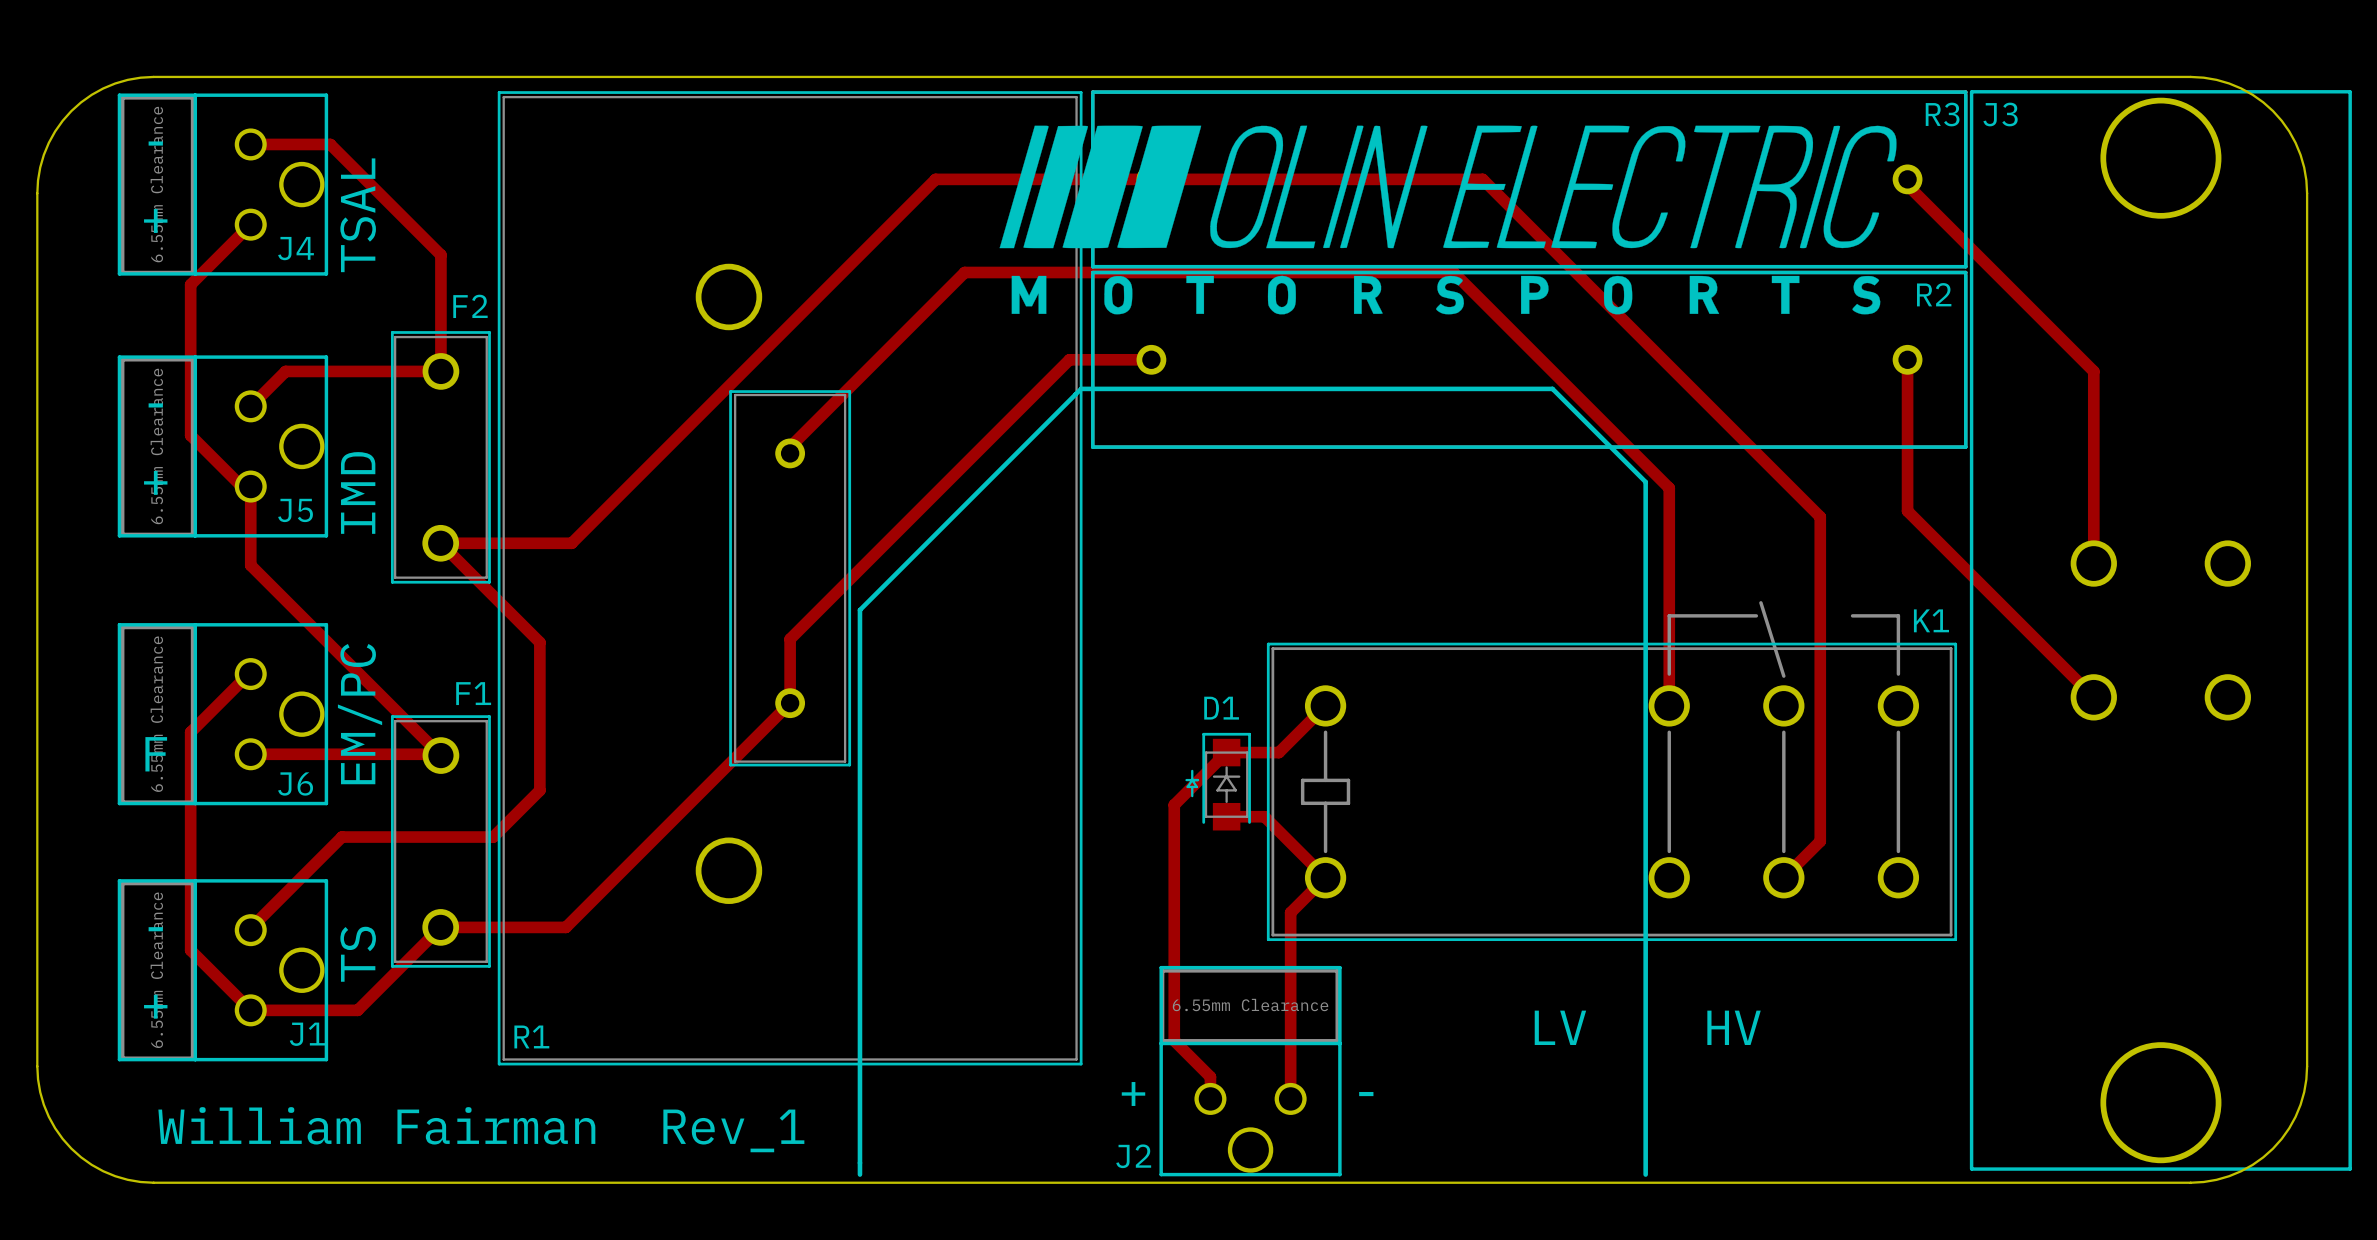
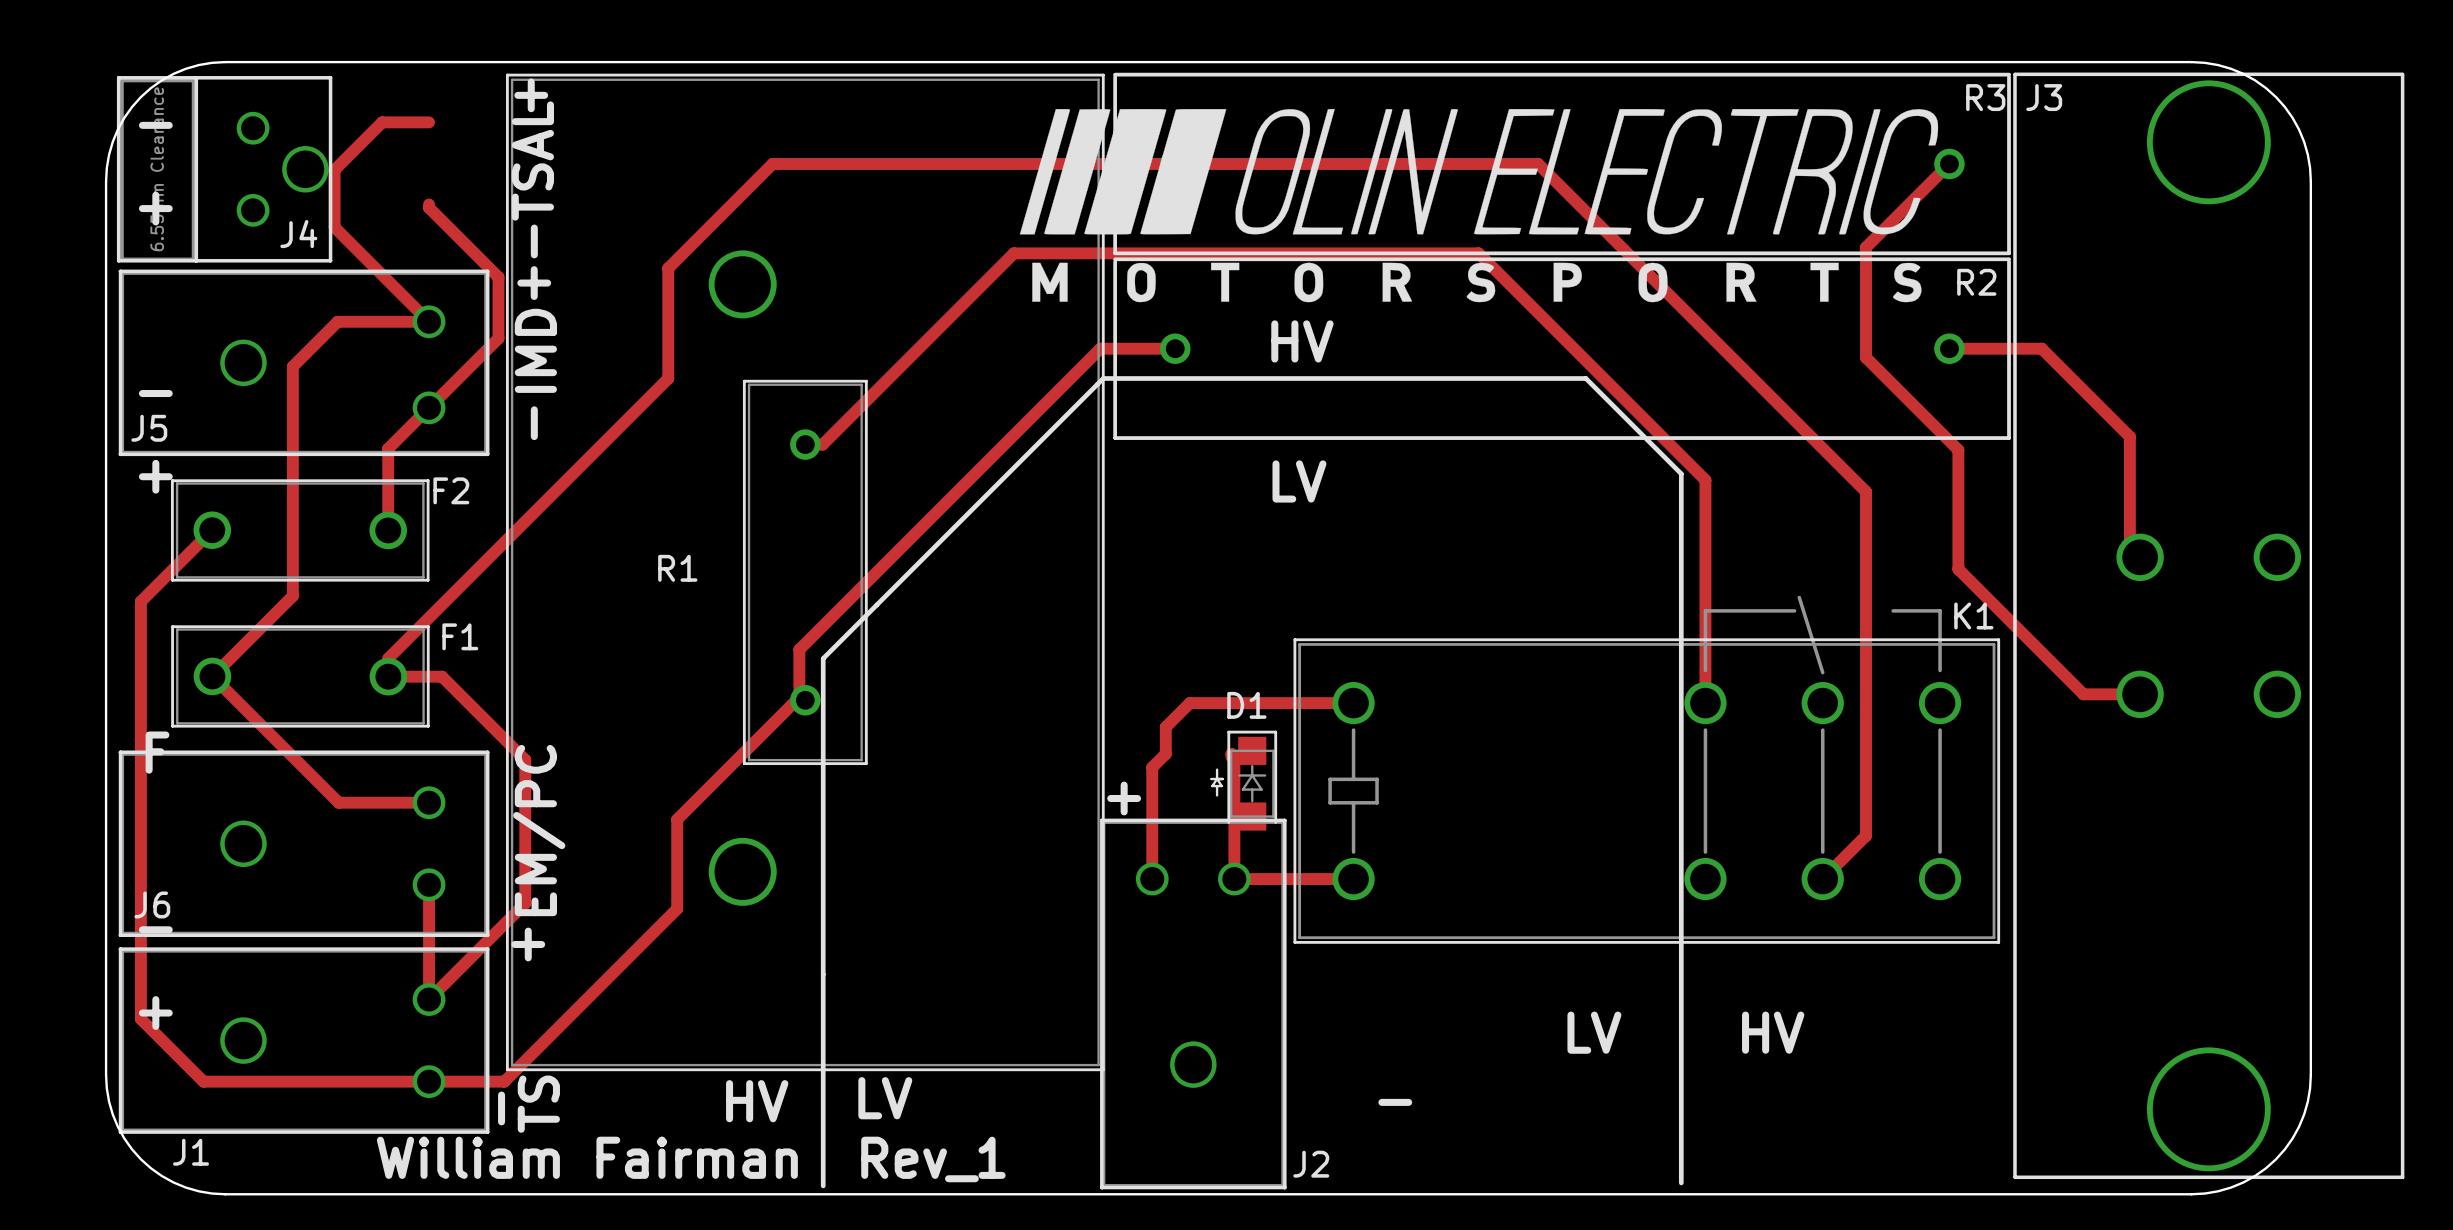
board edge: (153, 76) (2190, 76) (2216, 79) (2241, 88) (2263, 102) (2289, 131) (2304, 167) (2307, 193) (2307, 1066) (2304, 1092) (2295, 1116) (2273, 1148) (2252, 1164) (2229, 1176) (2190, 1182) (153, 1182) (127, 1179) (103, 1171) (81, 1157) (55, 1128) (43, 1104) (38, 1079) (37, 193) (40, 167) (48, 142) (71, 111) (103, 88) (127, 79) (153, 76) -> (225, 62) (198, 65) (173, 73) (140, 97) (117, 129) (109, 154) (106, 181) (106, 1088) (112, 1114) (132, 1149) (150, 1168) (173, 1182) (198, 1191) (225, 1194) (2191, 1194) (2231, 1187) (2255, 1176) (2275, 1159) (2299, 1126) (2307, 1101) (2310, 1075) (2310, 181) (2307, 154) (2292, 117) (2275, 97) (2243, 73) (2218, 65) (2191, 62) (225, 62)
text: none -> + (531, 95)
top track: none -> (429, 122) (382, 122) (334, 169) (334, 227) (429, 321)
top track: (250, 144) (330, 144) (440, 255) (440, 371) (285, 371) (250, 406) -> none
top track: (935, 179) (571, 543) (432, 543) -> (954, 163) (772, 163) (668, 268) (668, 378) (388, 658) (388, 676) (442, 676) (525, 759) (525, 903) (429, 999) (429, 884)
top track: (1482, 179) (1820, 516) (1820, 841) -> (1514, 163) (1538, 163) (1866, 491) (1866, 835) (1860, 841)
top track: none -> (1949, 163) (1866, 247) (1866, 357) (1958, 450) (1958, 569) (2083, 694) (2119, 694)
top track: (1907, 185) (2093, 371) (2093, 563) -> none
text position: TSAL (358, 215) -> TSAL (532, 161)
top track: none -> (429, 204) (429, 207) (498, 277) (498, 338) (388, 448) (388, 530)
top track: (250, 224) (190, 284) (190, 435) (241, 486) (250, 486) (250, 565) (440, 755) -> none
text: none -> - (534, 241)
top track: (1453, 272) (964, 272) (790, 447) (790, 453) -> (1484, 259) (1478, 253) (1013, 253) (822, 444) (810, 444)
text: none -> + (534, 283)
F2 name position: F2 (470, 306) -> F2 (451, 490)
top track: none -> (429, 321) (337, 321) (292, 366) (292, 596) (212, 676) (338, 802) (429, 802)
text: none -> HV (1302, 341)
J5 footprint: [117, 355, 329, 538] -> [118, 269, 490, 457]
top track: (1078, 359) (1069, 359) (790, 639) (790, 703) (565, 927) (440, 927) (357, 1010) (250, 1010) (190, 950) (190, 732) (250, 674) -> (1100, 348) (799, 649) (799, 697) (677, 819) (677, 908) (504, 1081) (203, 1081) (140, 1019) (140, 601) (212, 530)
top track: (1907, 359) (1907, 511) (2093, 697) -> (1949, 348) (2041, 348) (2129, 436) (2129, 557)
text: none -> - (534, 423)
F2 rotation: 0° (440, 457) -> 90° clockwise (300, 530)
F2 position: (440, 457) -> (300, 530)
text: none -> LV (1299, 481)
text position: IMD (358, 492) -> IMD (535, 350)
J5 name position: J5 (295, 510) -> J5 (149, 428)
top track: (440, 543) (539, 642) (539, 790) (493, 837) (341, 837) (250, 930) -> none
line: (859, 610) (859, 1174) -> (876, 604) (823, 658) (823, 1185)
J6 footprint: [117, 623, 329, 806] -> [118, 750, 490, 938]
F1 name position: F1 (473, 693) -> F1 (460, 636)
top track: (1325, 705) (1278, 752) (1226, 752) (1174, 804) (1174, 1040) (1210, 1076) (1210, 1098) -> (1353, 703) (1189, 703) (1165, 727) (1165, 753) (1152, 767) (1152, 879)
text position: EM/PC (360, 714) -> EM/PC (539, 830)
top track: (250, 754) (439, 754) -> none
top track: none -> (1231, 756) (1231, 753) (1234, 756) (1234, 879) (1353, 879)
J6 name position: J6 (295, 783) -> J6 (152, 904)
top track: (1226, 816) (1264, 816) (1325, 877) (1290, 912) (1290, 1098) -> none
F1 rotation: 0° (440, 841) -> 90° clockwise (300, 676)
F1 position: (440, 841) -> (300, 676)
J1 footprint: [117, 879, 329, 1062] -> [118, 947, 490, 1134]
text: none -> + (528, 944)
text position: TS (358, 954) -> TS (538, 1104)
J2 footprint: [1159, 965, 1342, 1177] -> [1100, 818, 1287, 1190]
J1 name position: J1 (307, 1034) -> J1 (191, 1152)
R1 name position: R1 (531, 1036) -> R1 (677, 568)
text: none -> LV (885, 1098)
text position: + (1133, 1093) -> + (1124, 798)
text: none -> HV (757, 1101)
text: none -> - (501, 1108)
text position: William Fairman Rev_1 (481, 1129) -> William Fairman Rev_1 (691, 1159)
J2 name position: J2 (1133, 1156) -> J2 (1311, 1164)

